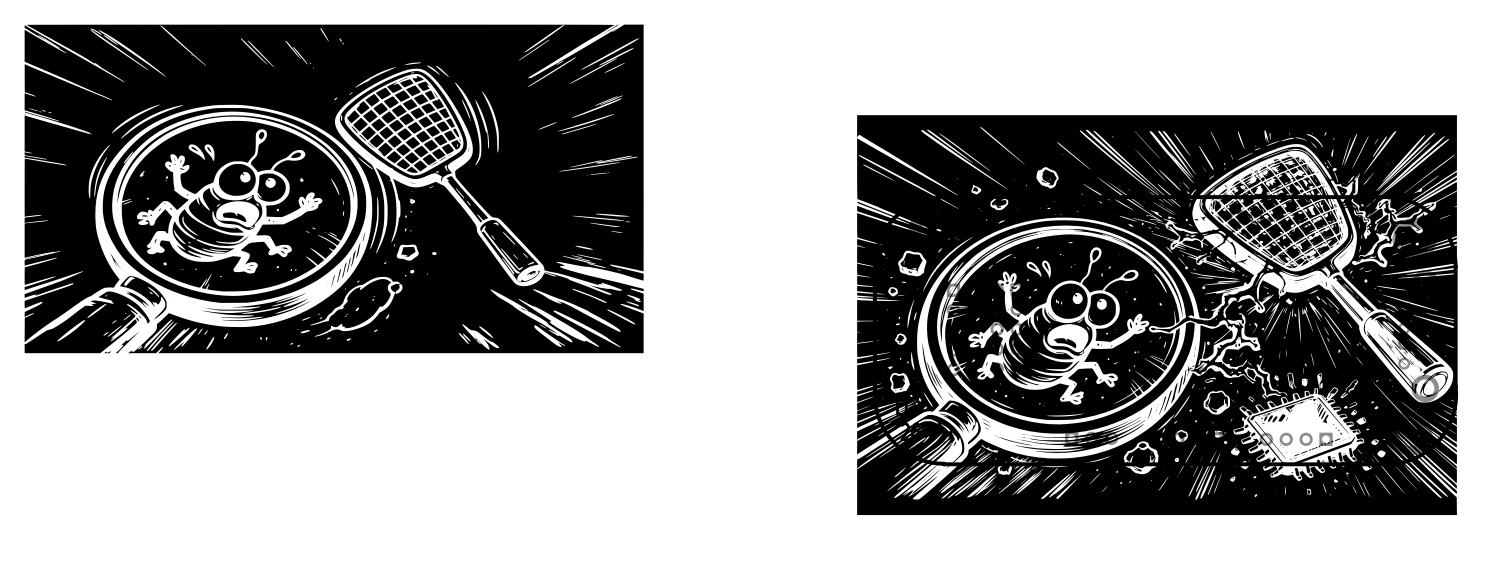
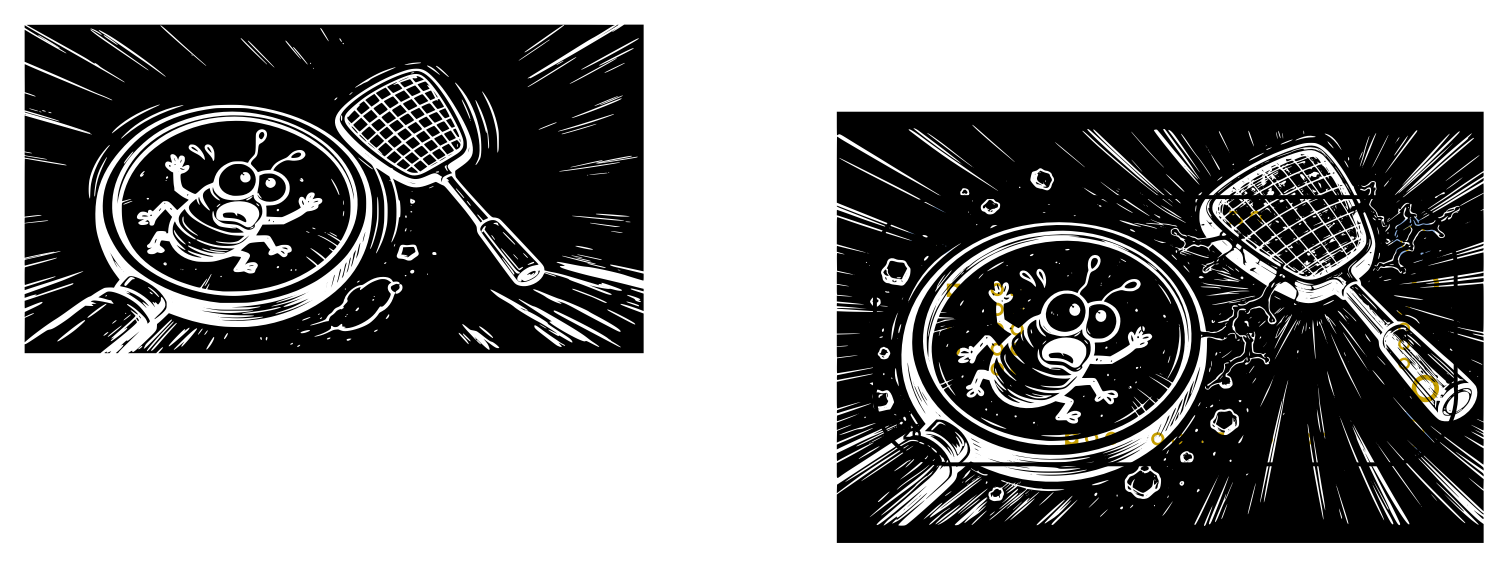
drawing: [857, 115, 1457, 516] -> none
part: none -> (1160, 327)

